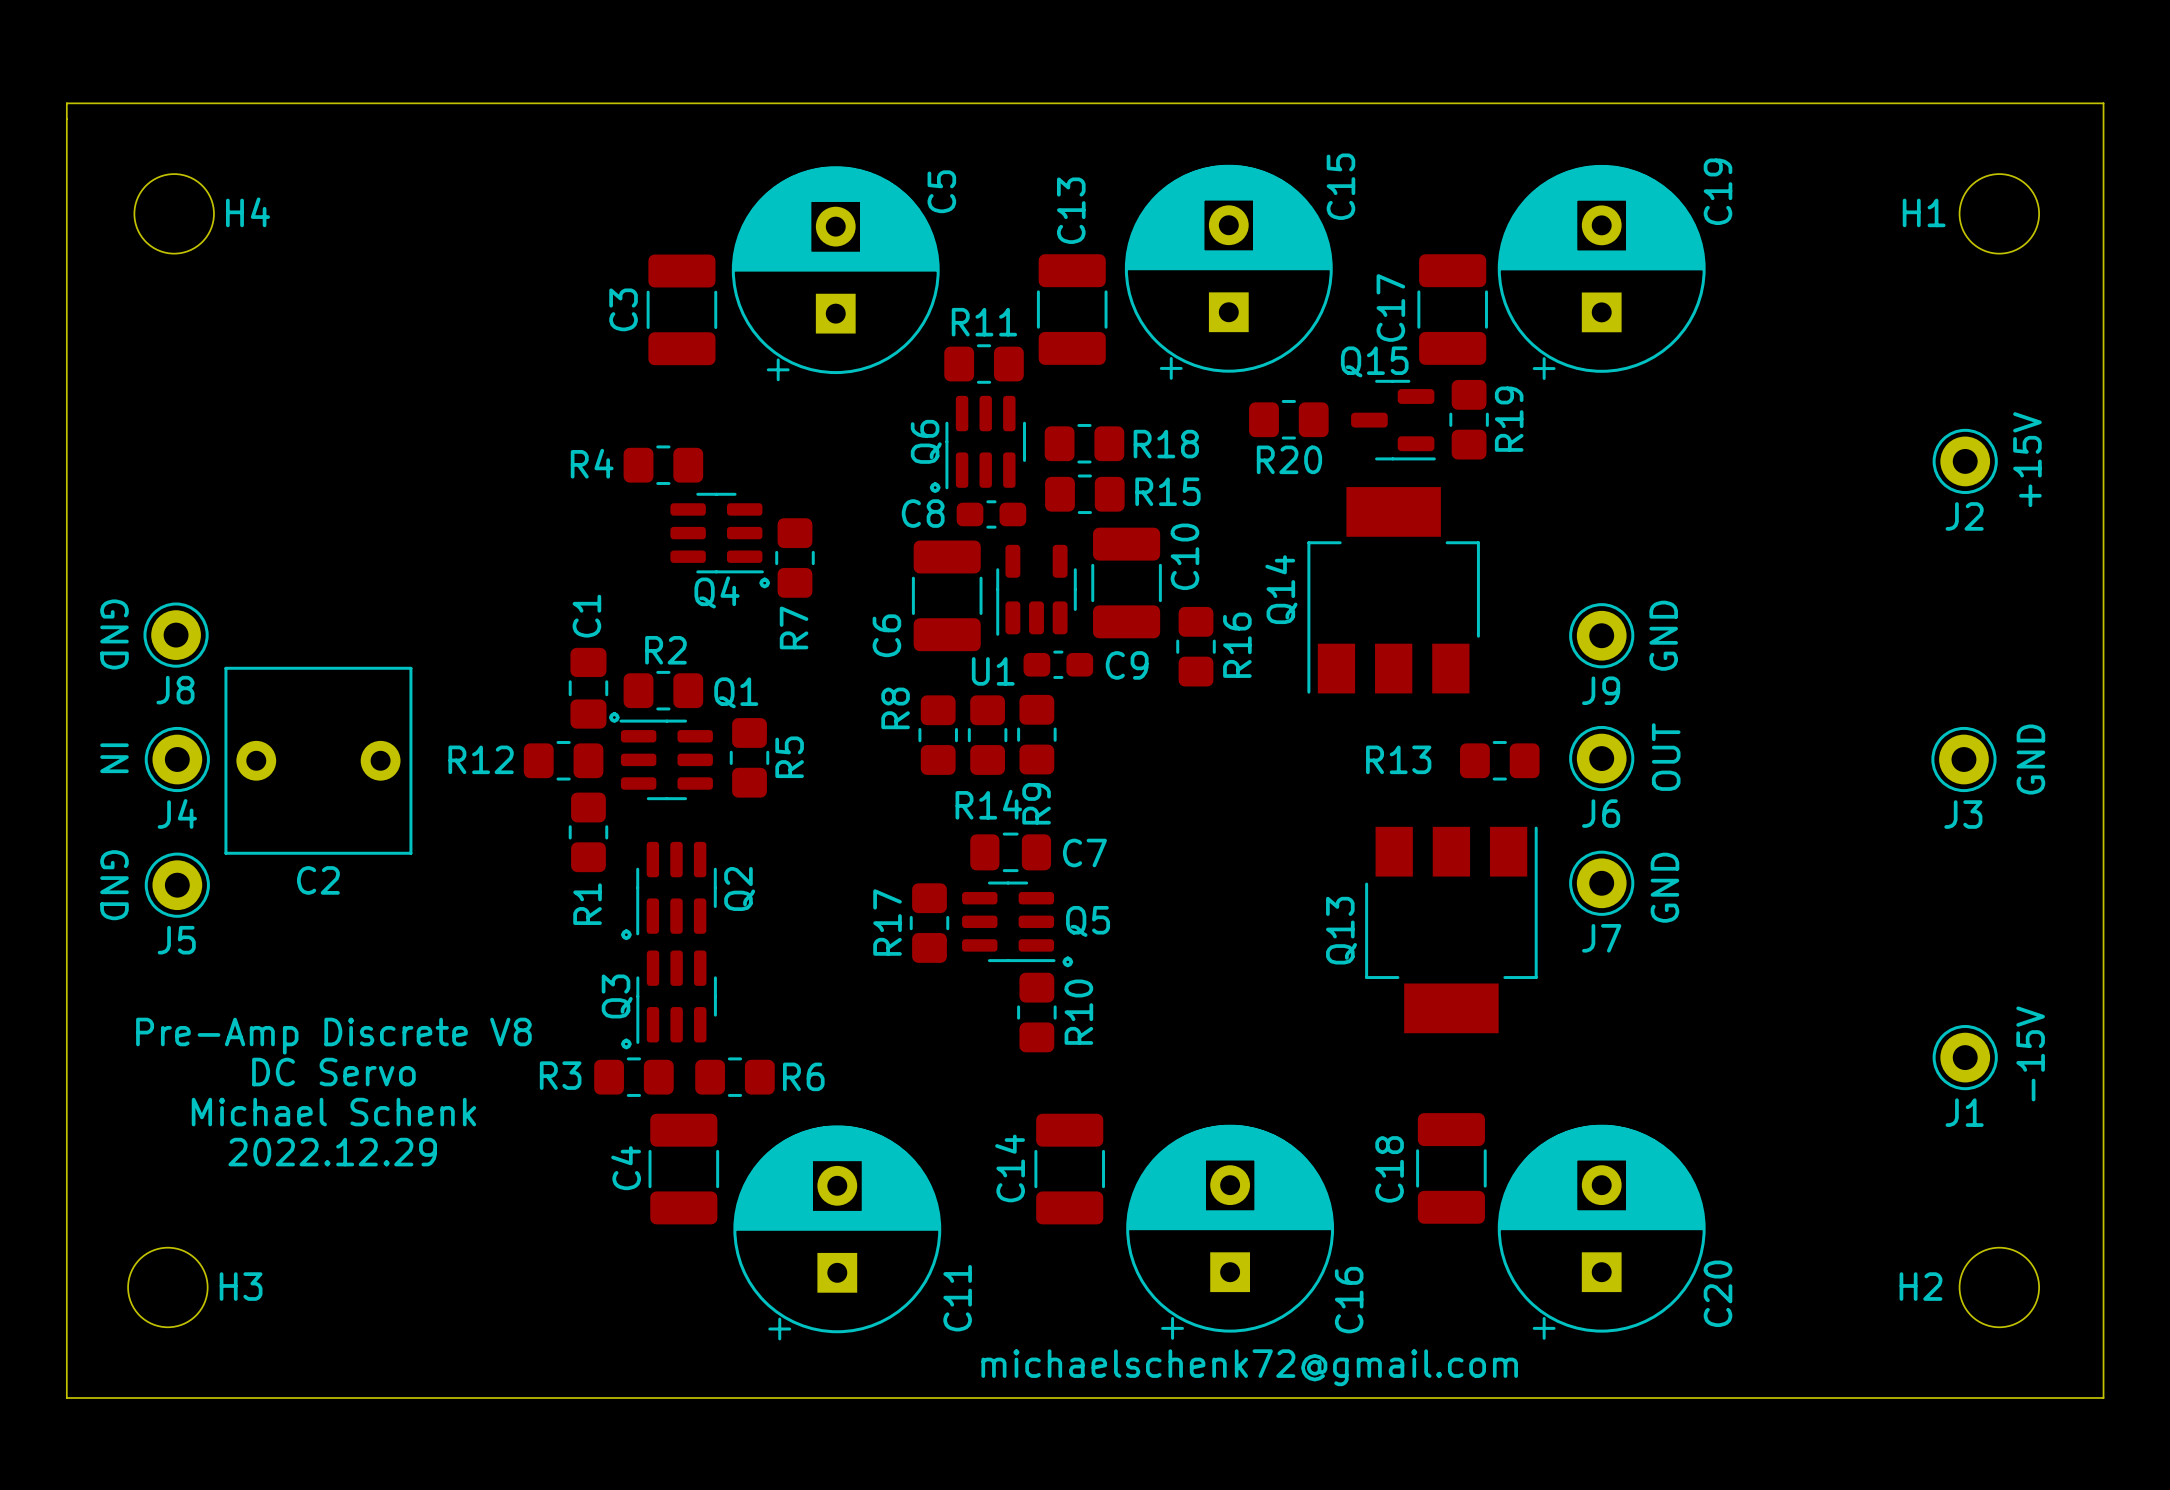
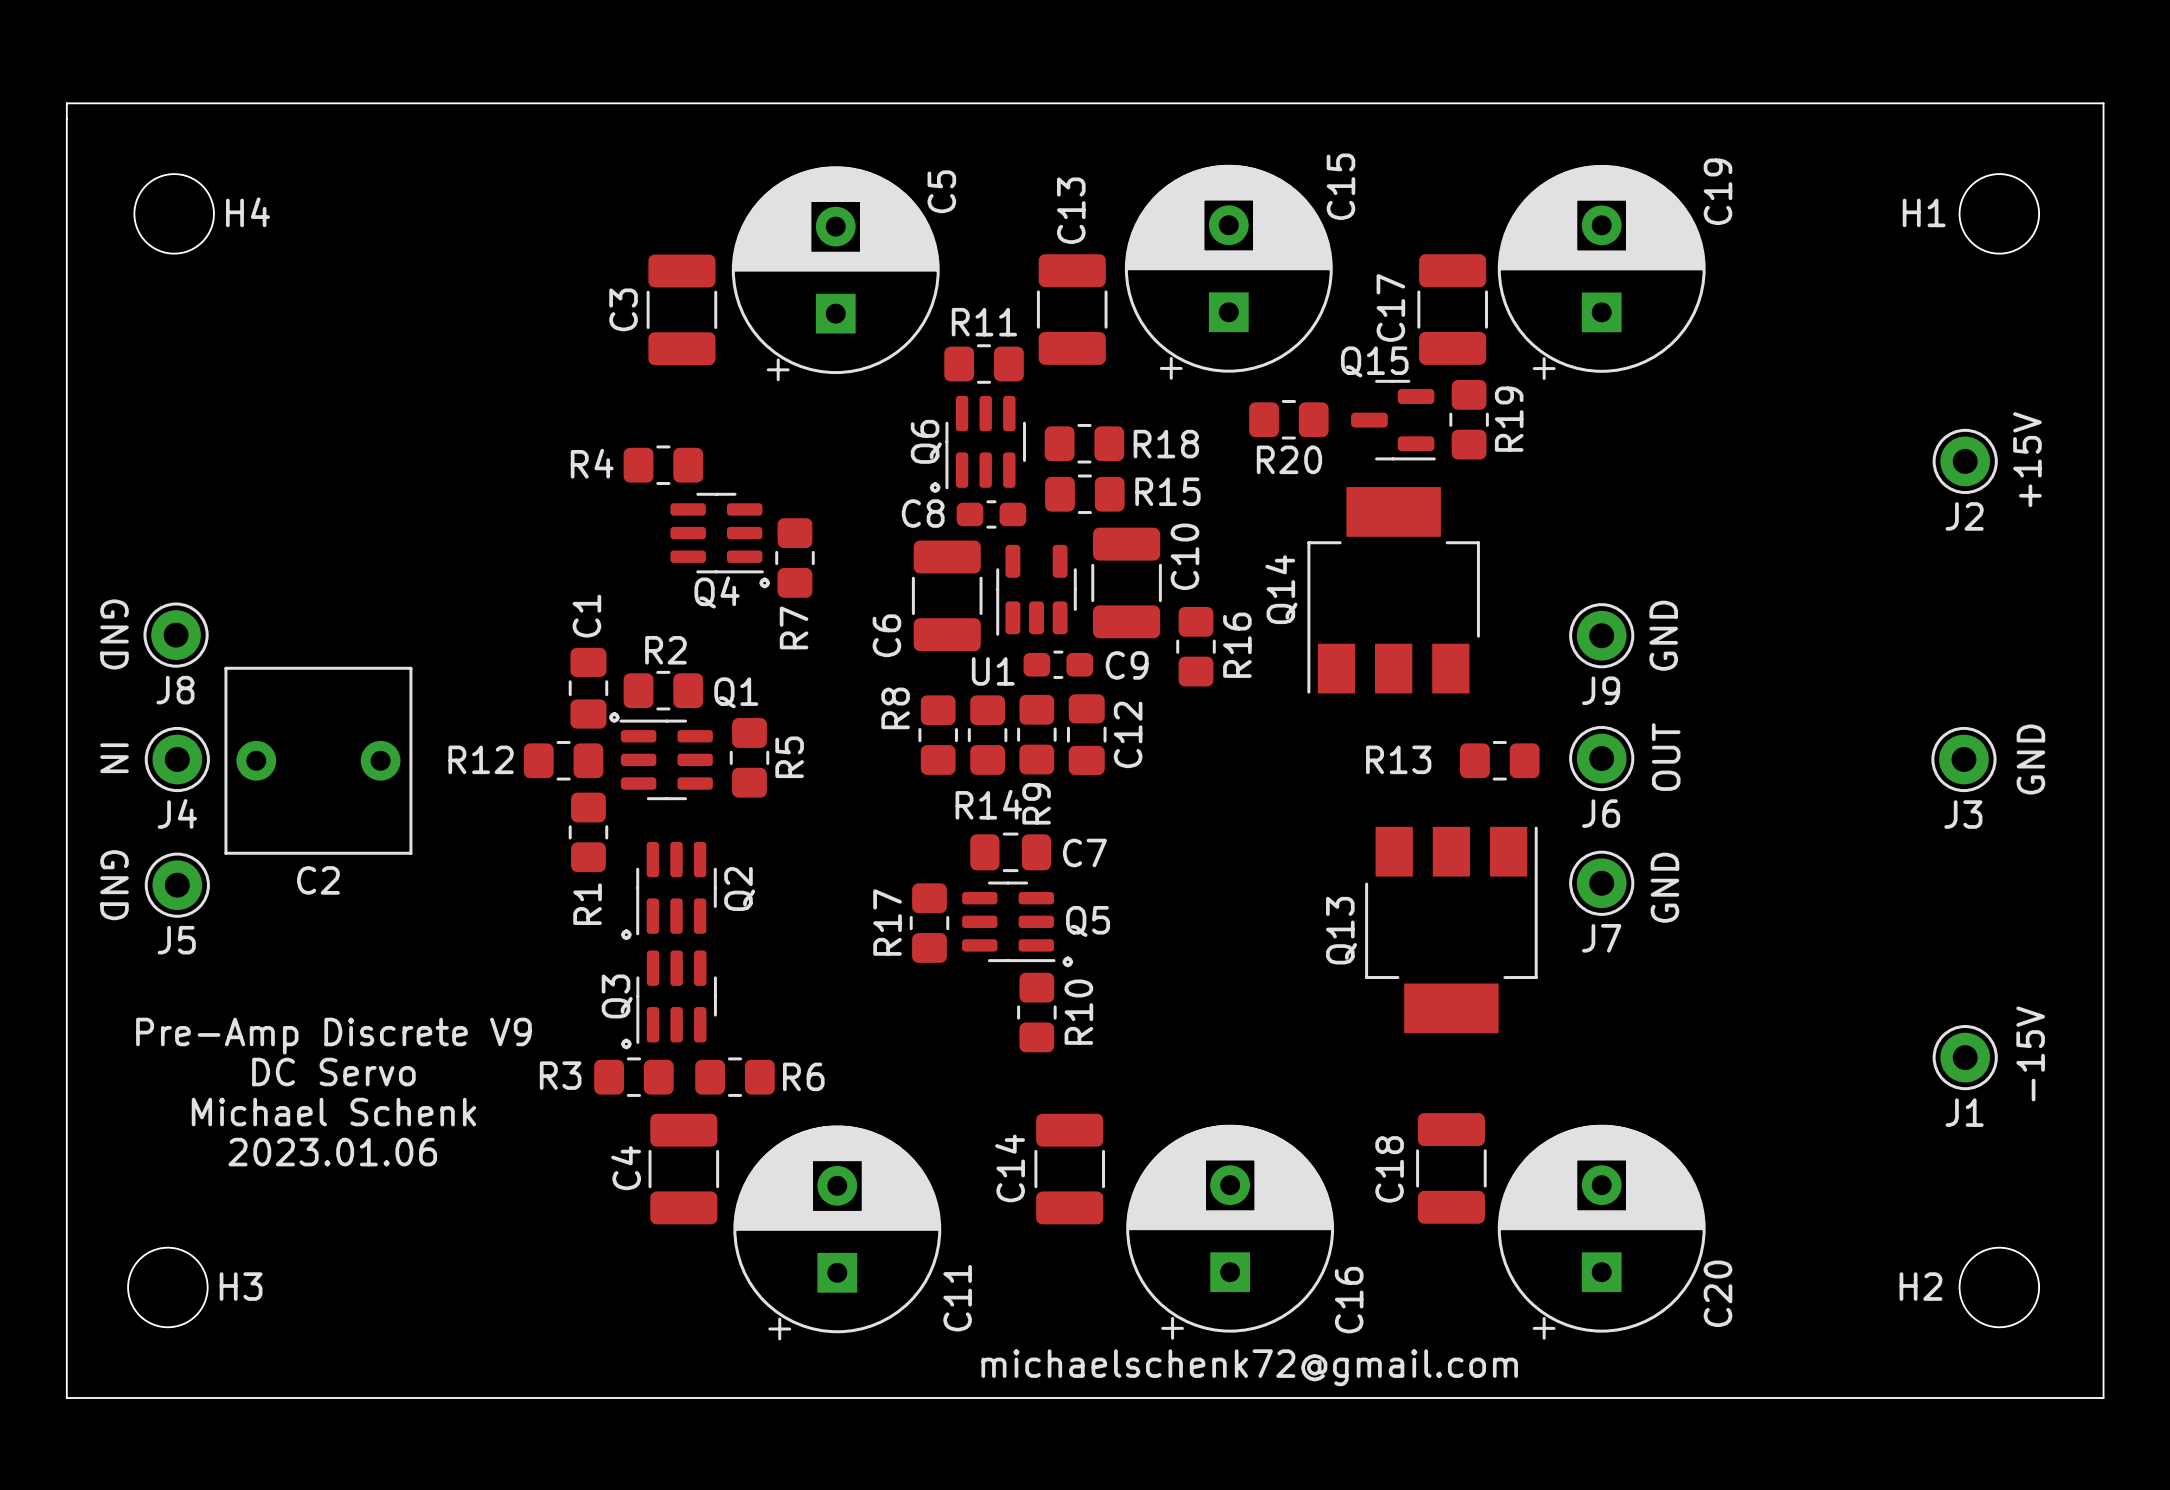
C12: none -> (1086, 734)
text: Pre-Amp Discrete V8 (333, 1036) -> Pre-Amp Discrete V9 (333, 1036)
text: 2022.12.29 (332, 1152) -> 2023.01.06 (332, 1152)

